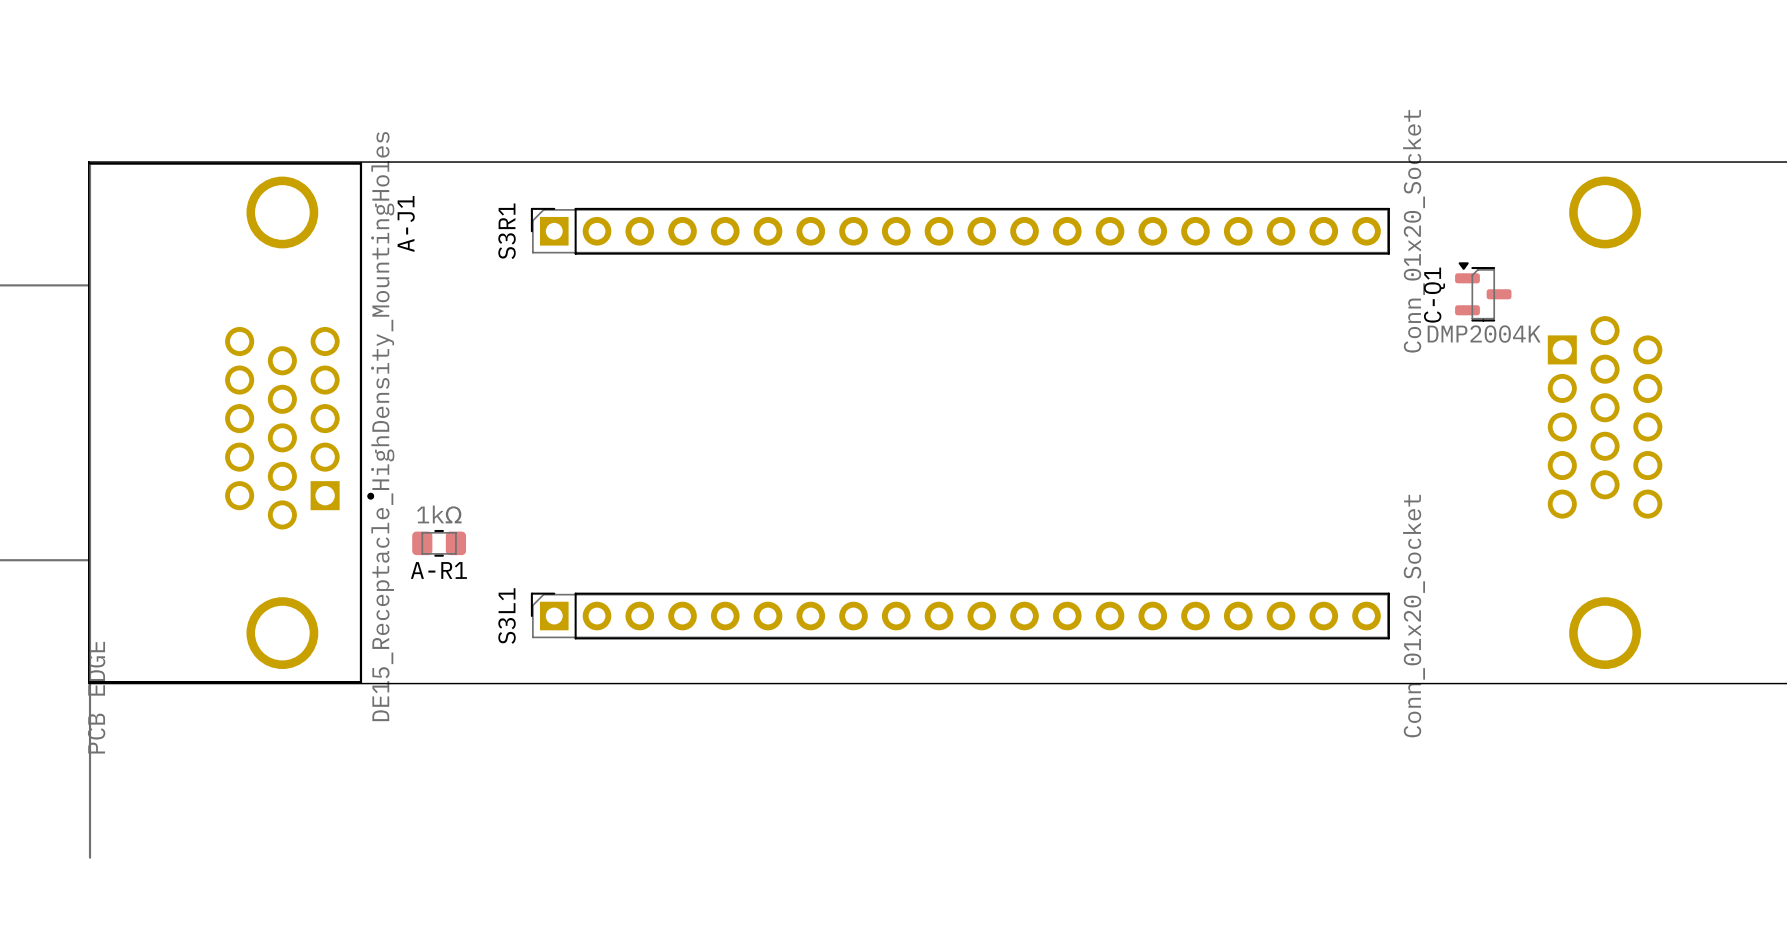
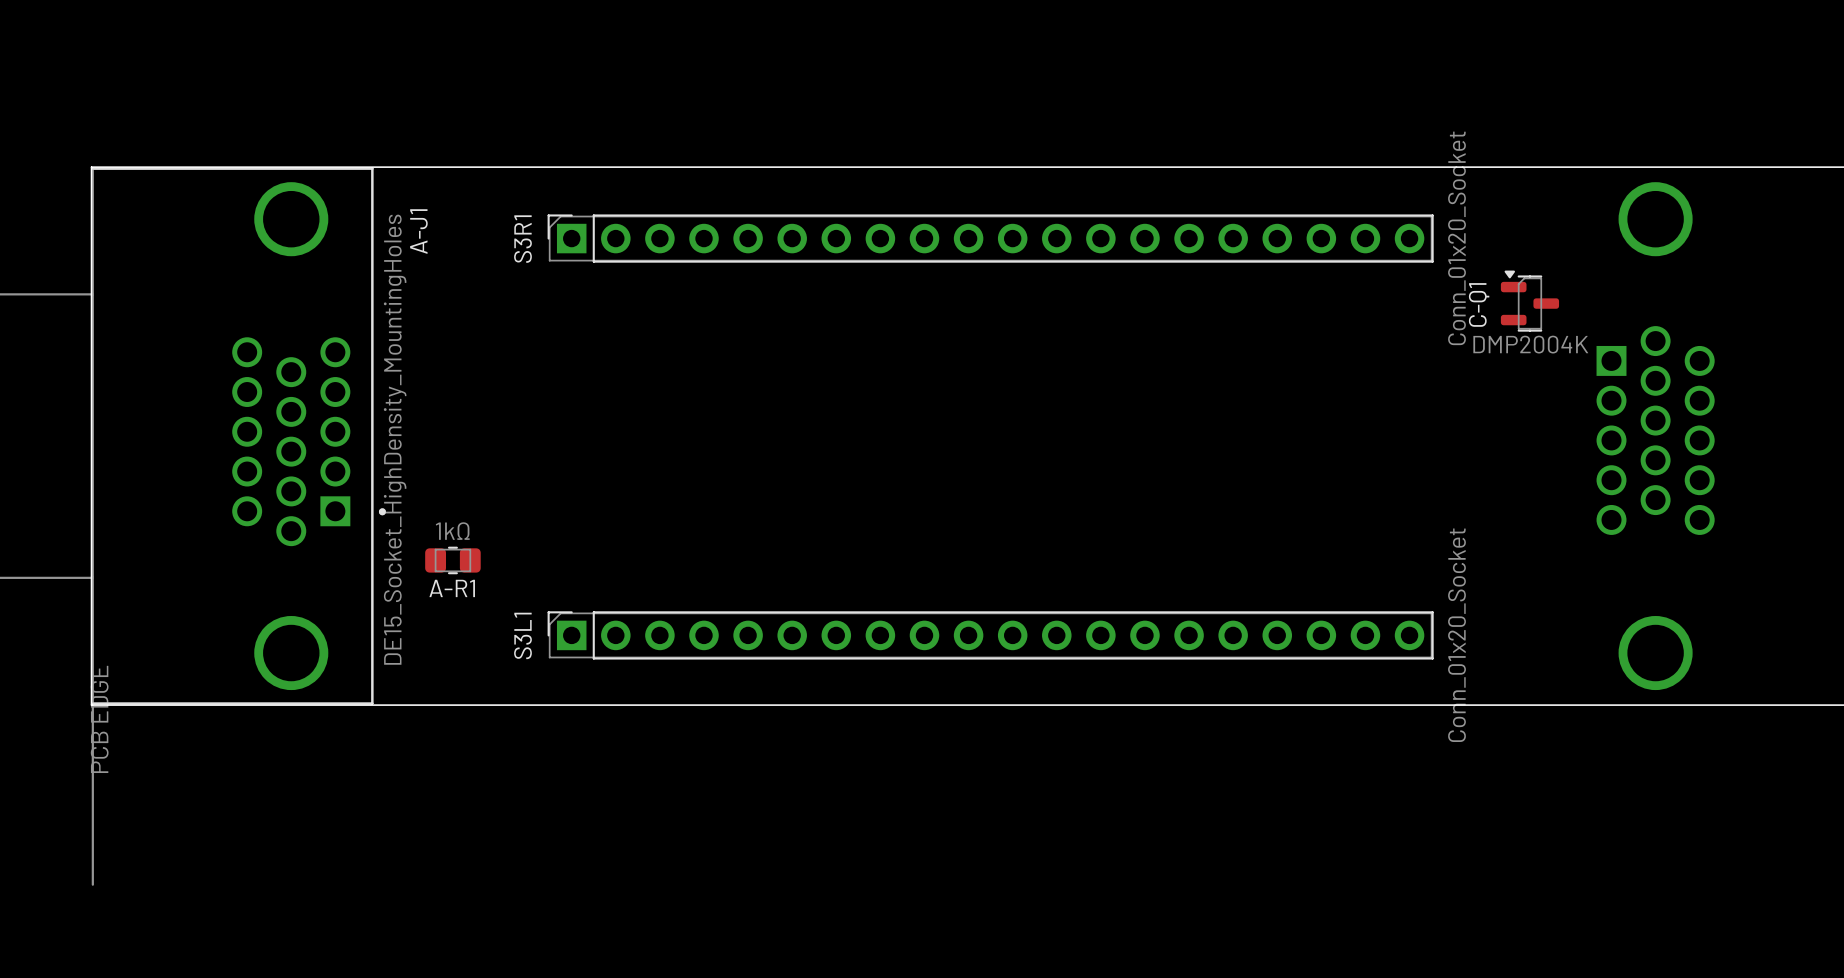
A-J1 value: DE15_Receptacle_HighDensity_MountingHoles (382, 426) -> DE15_Socket_HighDensity_MountingHoles (395, 439)

